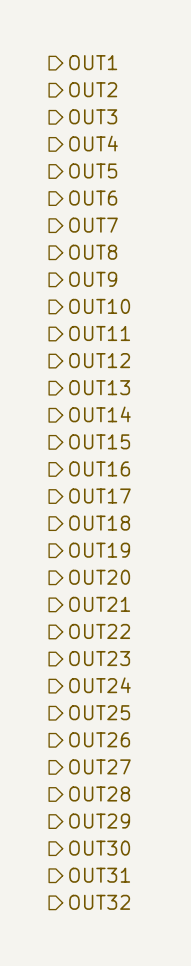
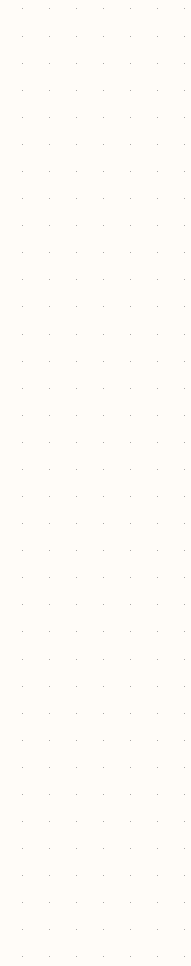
hierarchical label: OUT1 (93, 62) -> none
hierarchical label: OUT2 (93, 89) -> none
hierarchical label: OUT3 (93, 116) -> none
hierarchical label: OUT4 (93, 143) -> none
hierarchical label: OUT5 (93, 170) -> none
hierarchical label: OUT6 (93, 198) -> none
hierarchical label: OUT7 (93, 225) -> none
hierarchical label: OUT8 (93, 252) -> none
hierarchical label: OUT9 (93, 279) -> none
hierarchical label: OUT10 (99, 306) -> none
hierarchical label: OUT11 (99, 333) -> none
hierarchical label: OUT12 (99, 360) -> none
hierarchical label: OUT13 (99, 387) -> none
hierarchical label: OUT14 (99, 414) -> none
hierarchical label: OUT15 (99, 441) -> none
hierarchical label: OUT16 (99, 468) -> none
hierarchical label: OUT17 (99, 496) -> none
hierarchical label: OUT18 (99, 523) -> none
hierarchical label: OUT19 (99, 550) -> none
hierarchical label: OUT20 (99, 577) -> none
hierarchical label: OUT21 (99, 604) -> none
hierarchical label: OUT22 (99, 631) -> none
hierarchical label: OUT23 (99, 658) -> none
hierarchical label: OUT24 (99, 685) -> none
hierarchical label: OUT25 (99, 712) -> none
hierarchical label: OUT26 (99, 739) -> none
hierarchical label: OUT27 (99, 766) -> none
hierarchical label: OUT28 (99, 793) -> none
hierarchical label: OUT29 (99, 821) -> none
hierarchical label: OUT30 (99, 848) -> none
hierarchical label: OUT31 (99, 875) -> none
hierarchical label: OUT32 (99, 902) -> none

